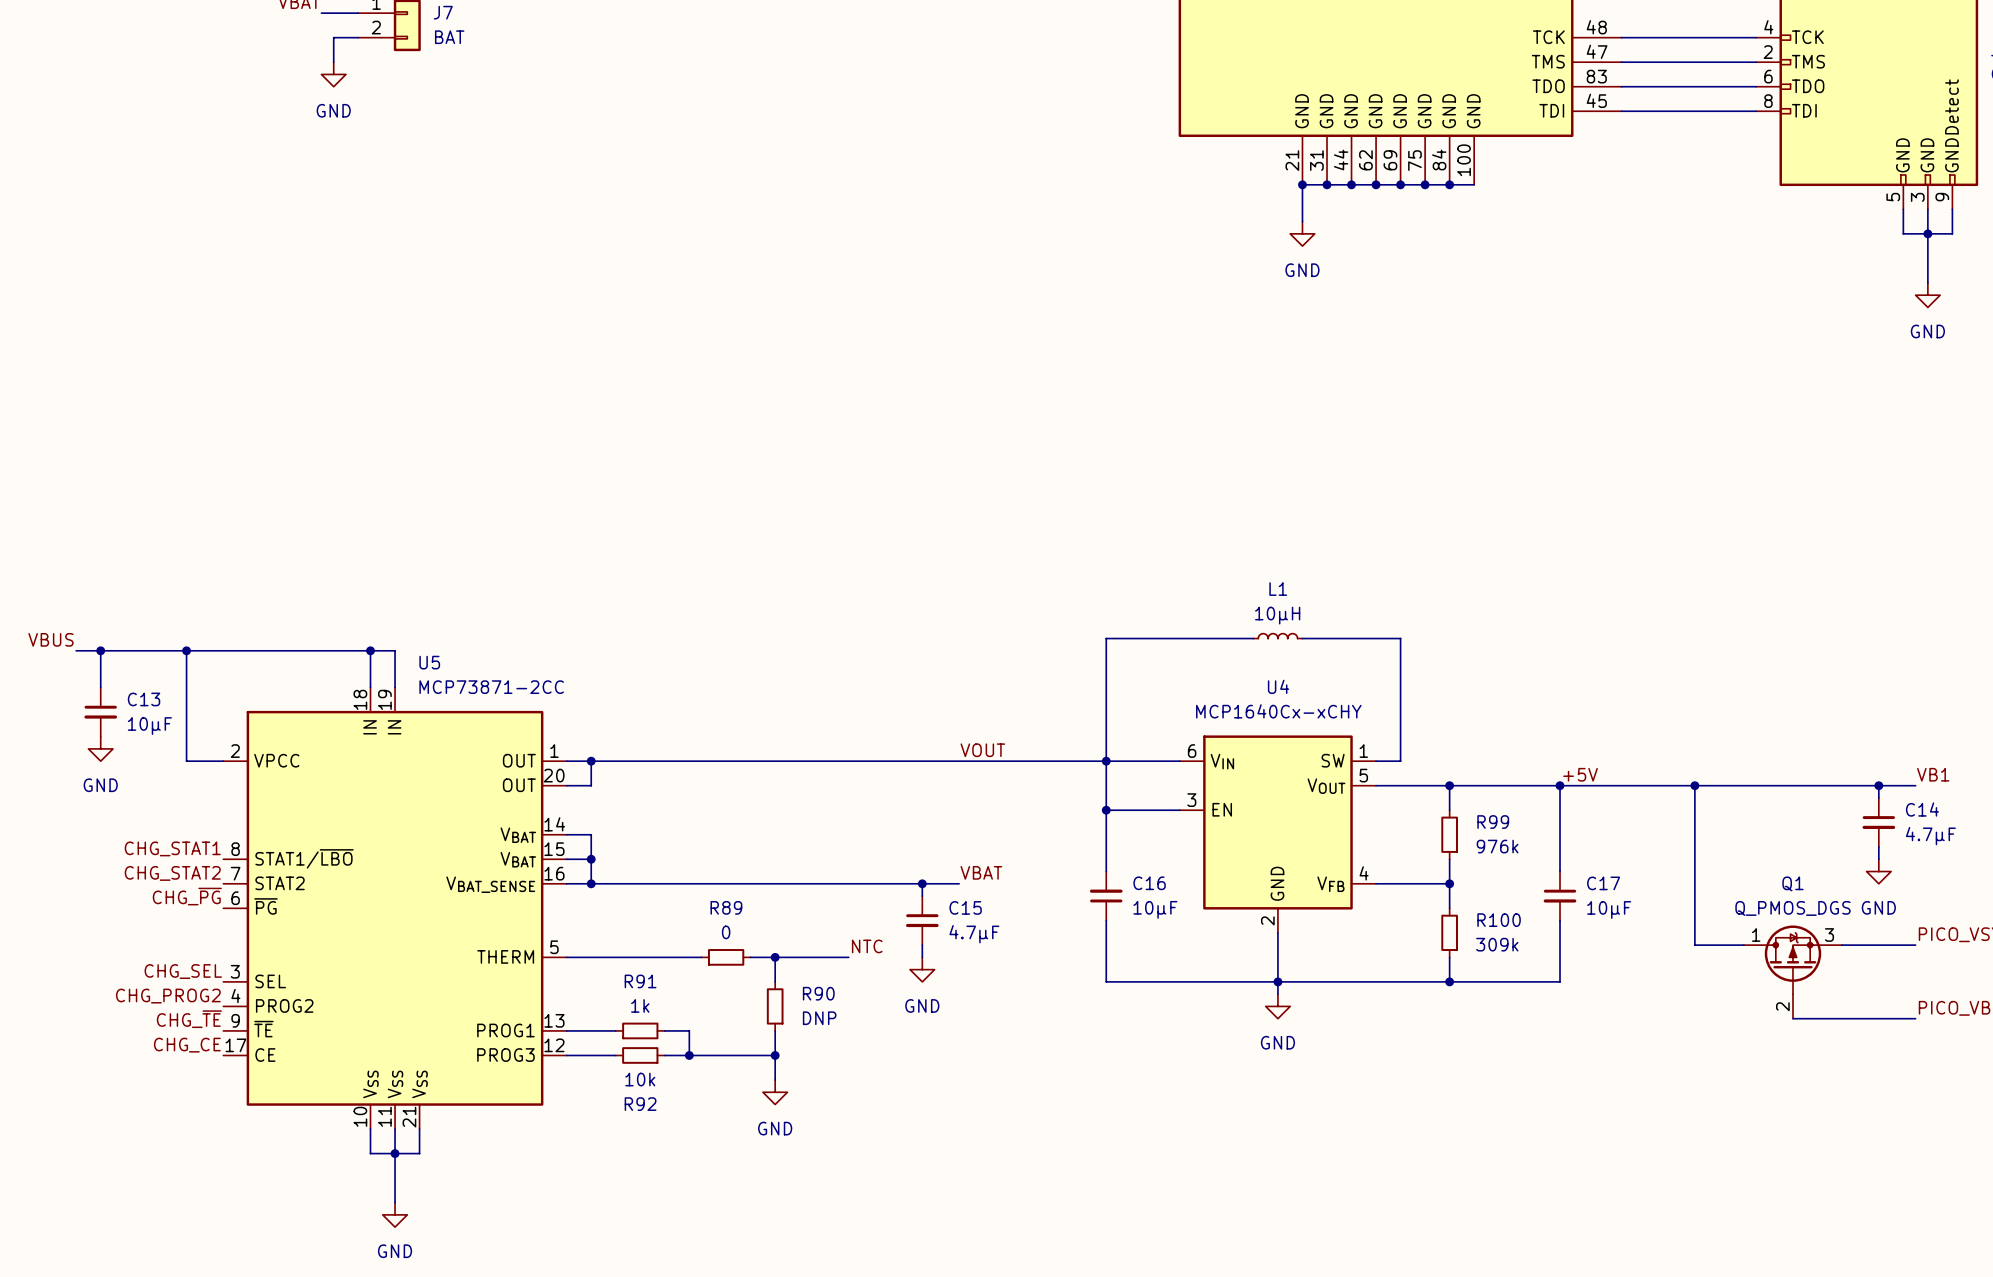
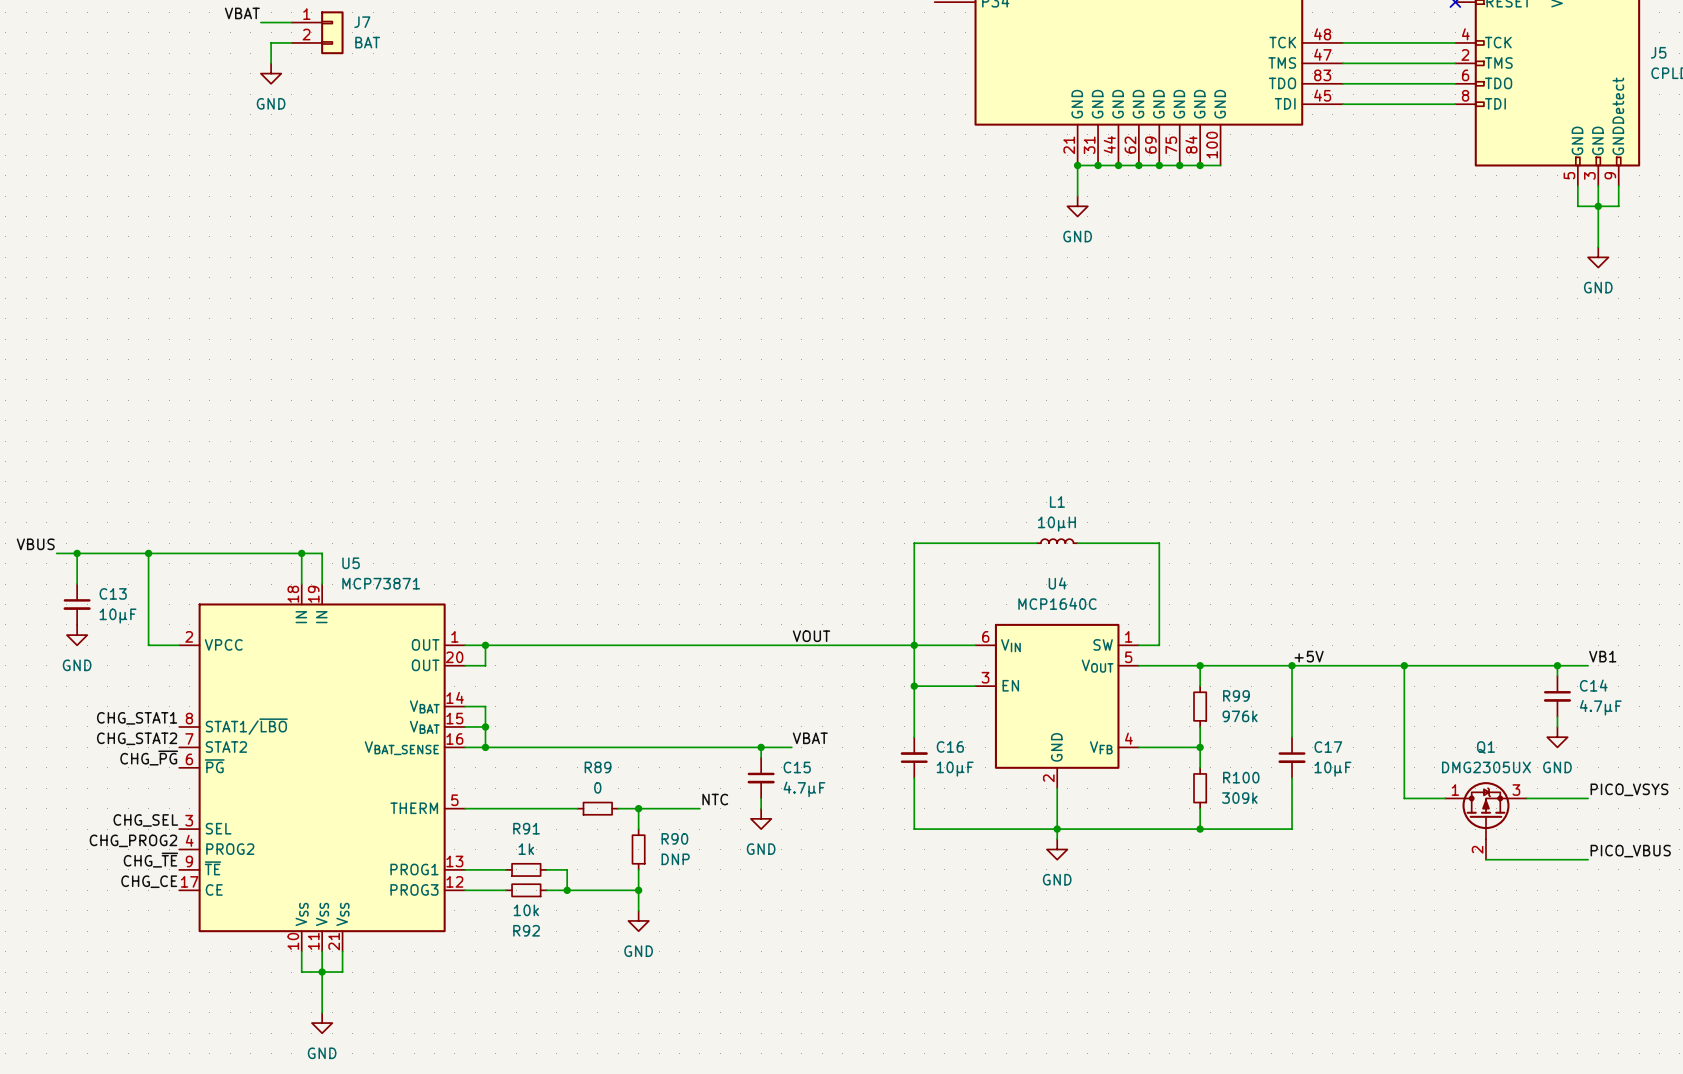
U5 value: MCP73871-2CC (491, 687) -> MCP73871 (381, 583)
U4 value: MCP1640Cx-xCHY (1278, 711) -> MCP1640C (1057, 603)
Q1 value: Q_PMOS_DGS (1792, 908) -> DMG2305UX (1486, 767)

